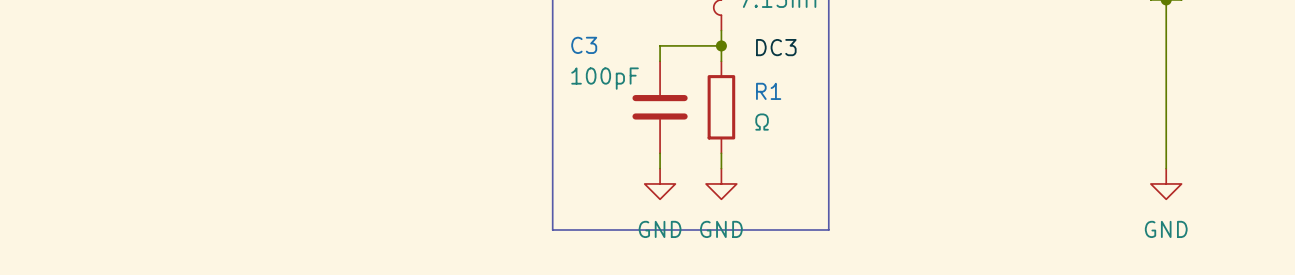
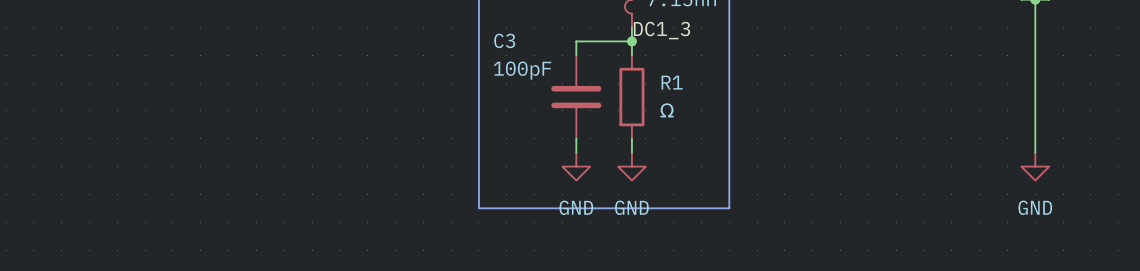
label: DC3 (776, 47) -> DC1_3 (661, 30)

